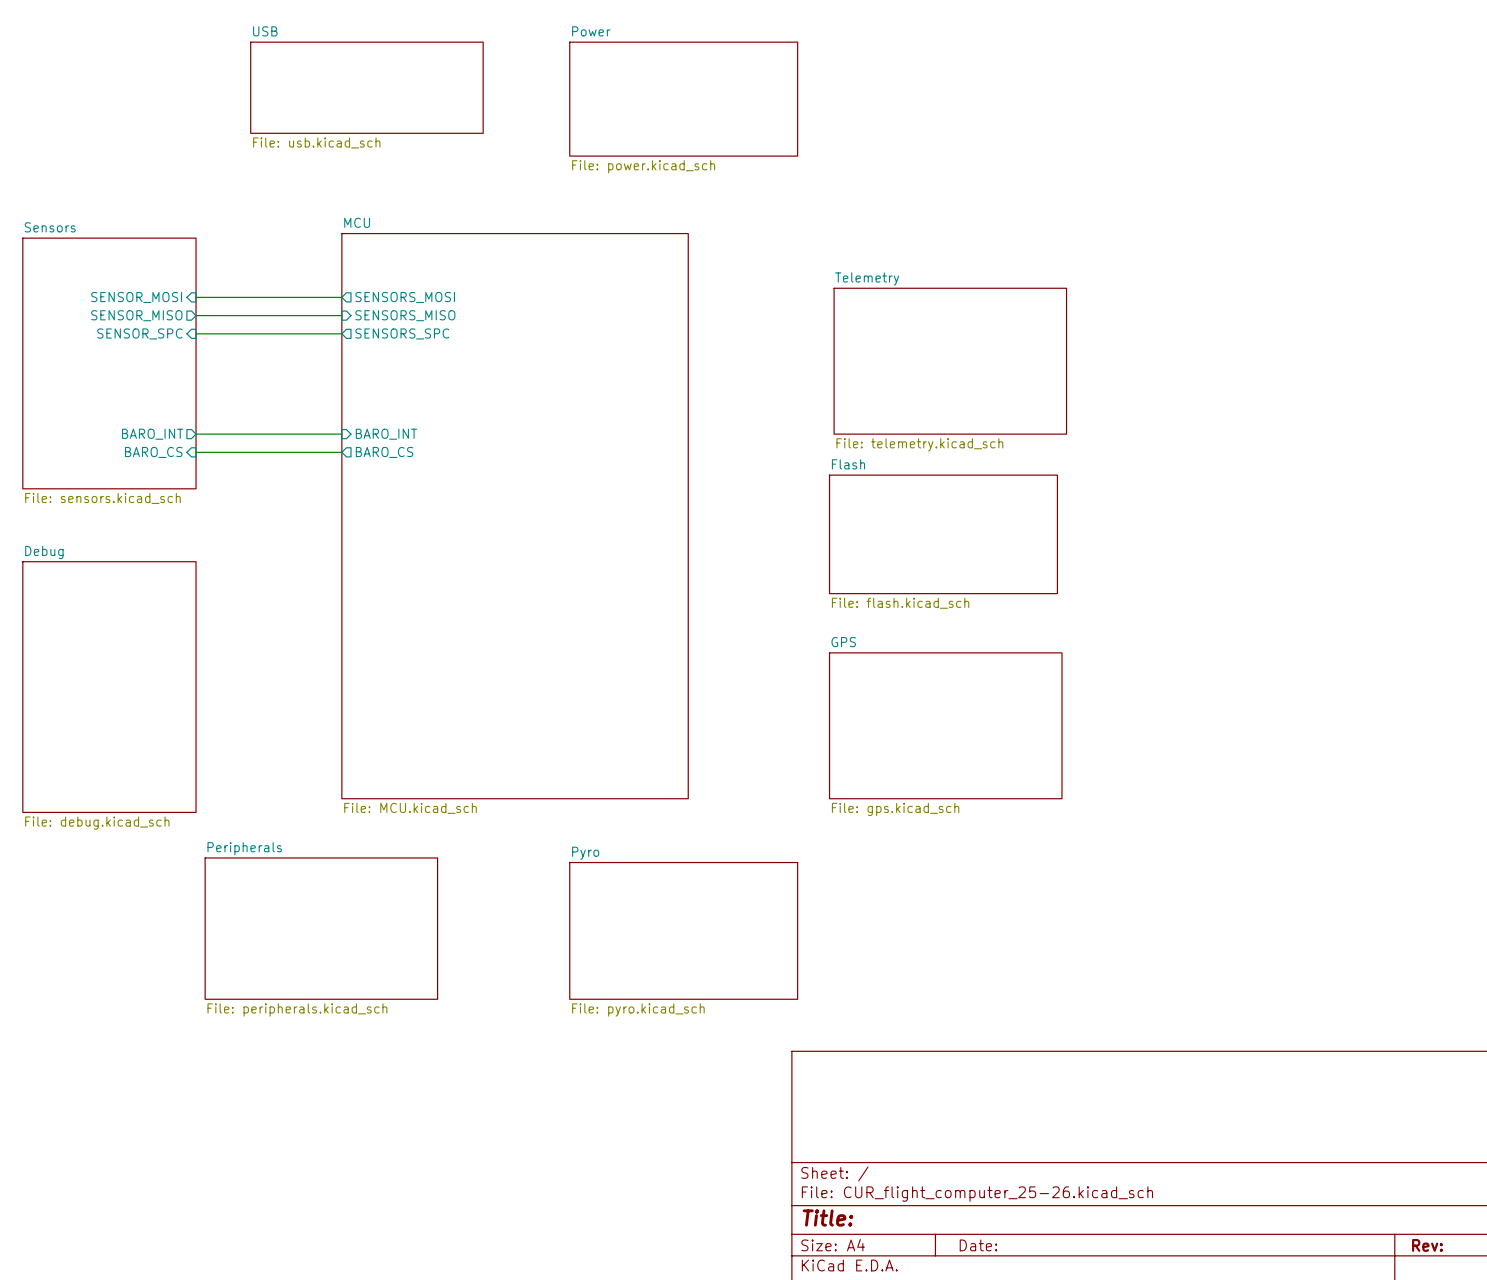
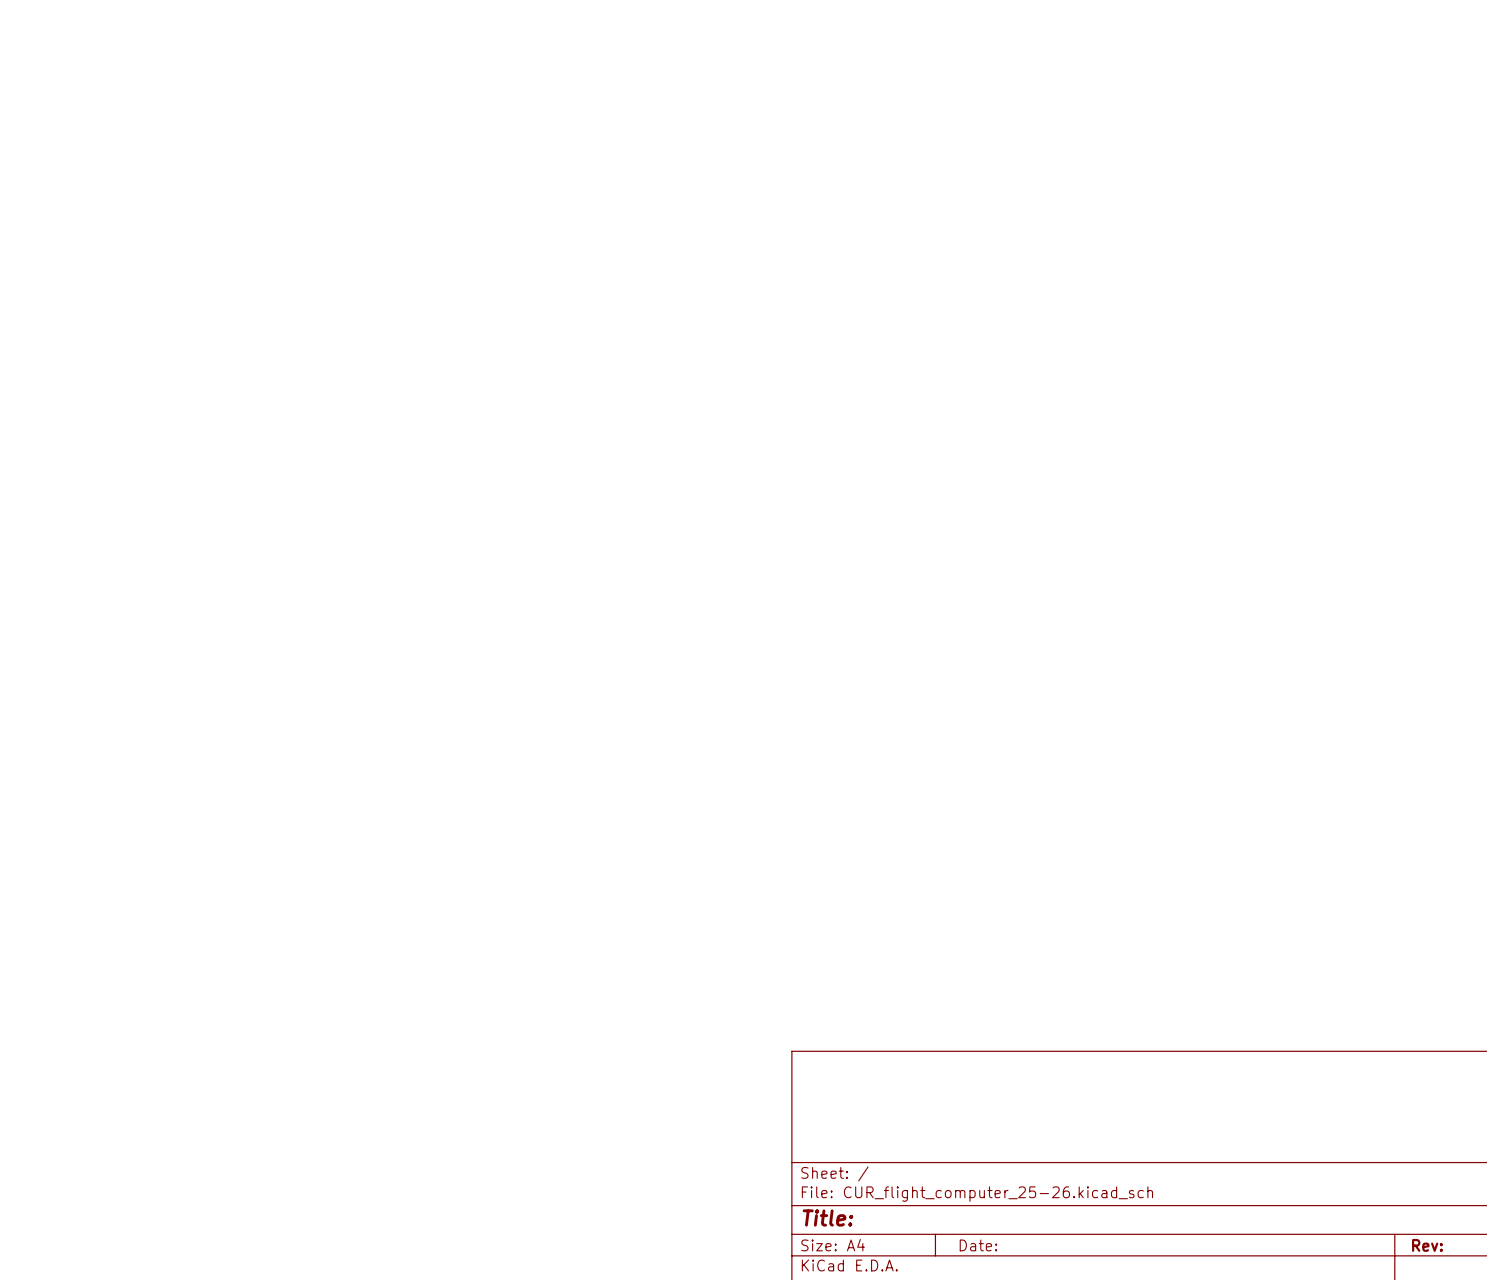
sheet USB: File: usb.kicad_sch (366, 87) -> none
sheet Power: File: power.kicad_sch (683, 99) -> none
sheet pin: SENSOR_MOSI (136, 297) -> none
wire: (196, 297) (341, 297) -> none
sheet pin: SENSORS_MOSI (405, 297) -> none
sheet pin: SENSOR_MISO (136, 315) -> none
wire: (196, 315) (341, 315) -> none
sheet pin: SENSORS_MISO (405, 315) -> none
sheet pin: SENSOR_SPC (139, 333) -> none
wire: (196, 333) (341, 333) -> none
sheet pin: SENSORS_SPC (402, 333) -> none
sheet Telemetry: File: telemetry.kicad_sch (950, 361) -> none
sheet Sensors: File: sensors.kicad_sch (109, 363) -> none
sheet pin: BARO_INT (152, 434) -> none
wire: (196, 434) (341, 434) -> none
sheet pin: BARO_INT (386, 434) -> none
sheet pin: BARO_CS (153, 452) -> none
wire: (196, 452) (341, 452) -> none
sheet pin: BARO_CS (384, 452) -> none
sheet MCU: File: MCU.kicad_sch (515, 516) -> none
sheet Flash: File: flash.kicad_sch (943, 534) -> none
sheet Debug: File: debug.kicad_sch (109, 687) -> none
sheet GPS: File: gps.kicad_sch (945, 725) -> none
sheet Peripherals: File: peripherals.kicad_sch (321, 928) -> none
sheet Pyro: File: pyro.kicad_sch (683, 930) -> none

